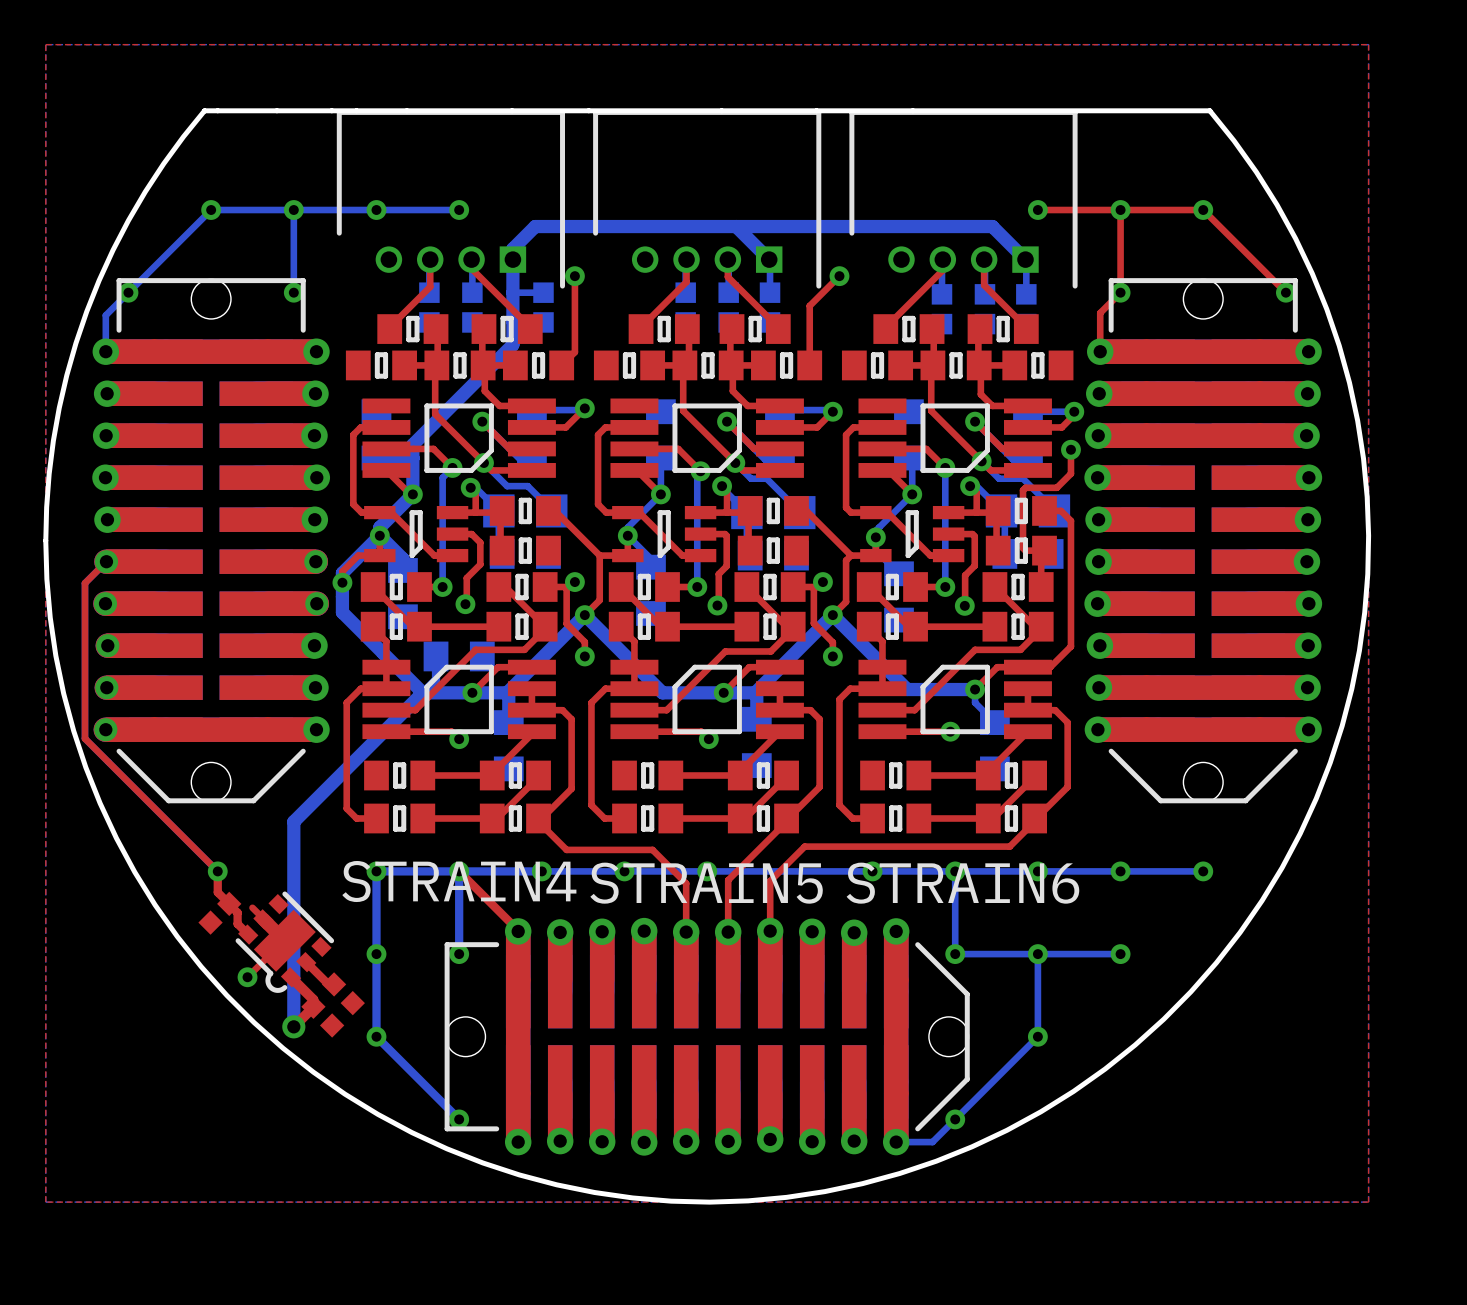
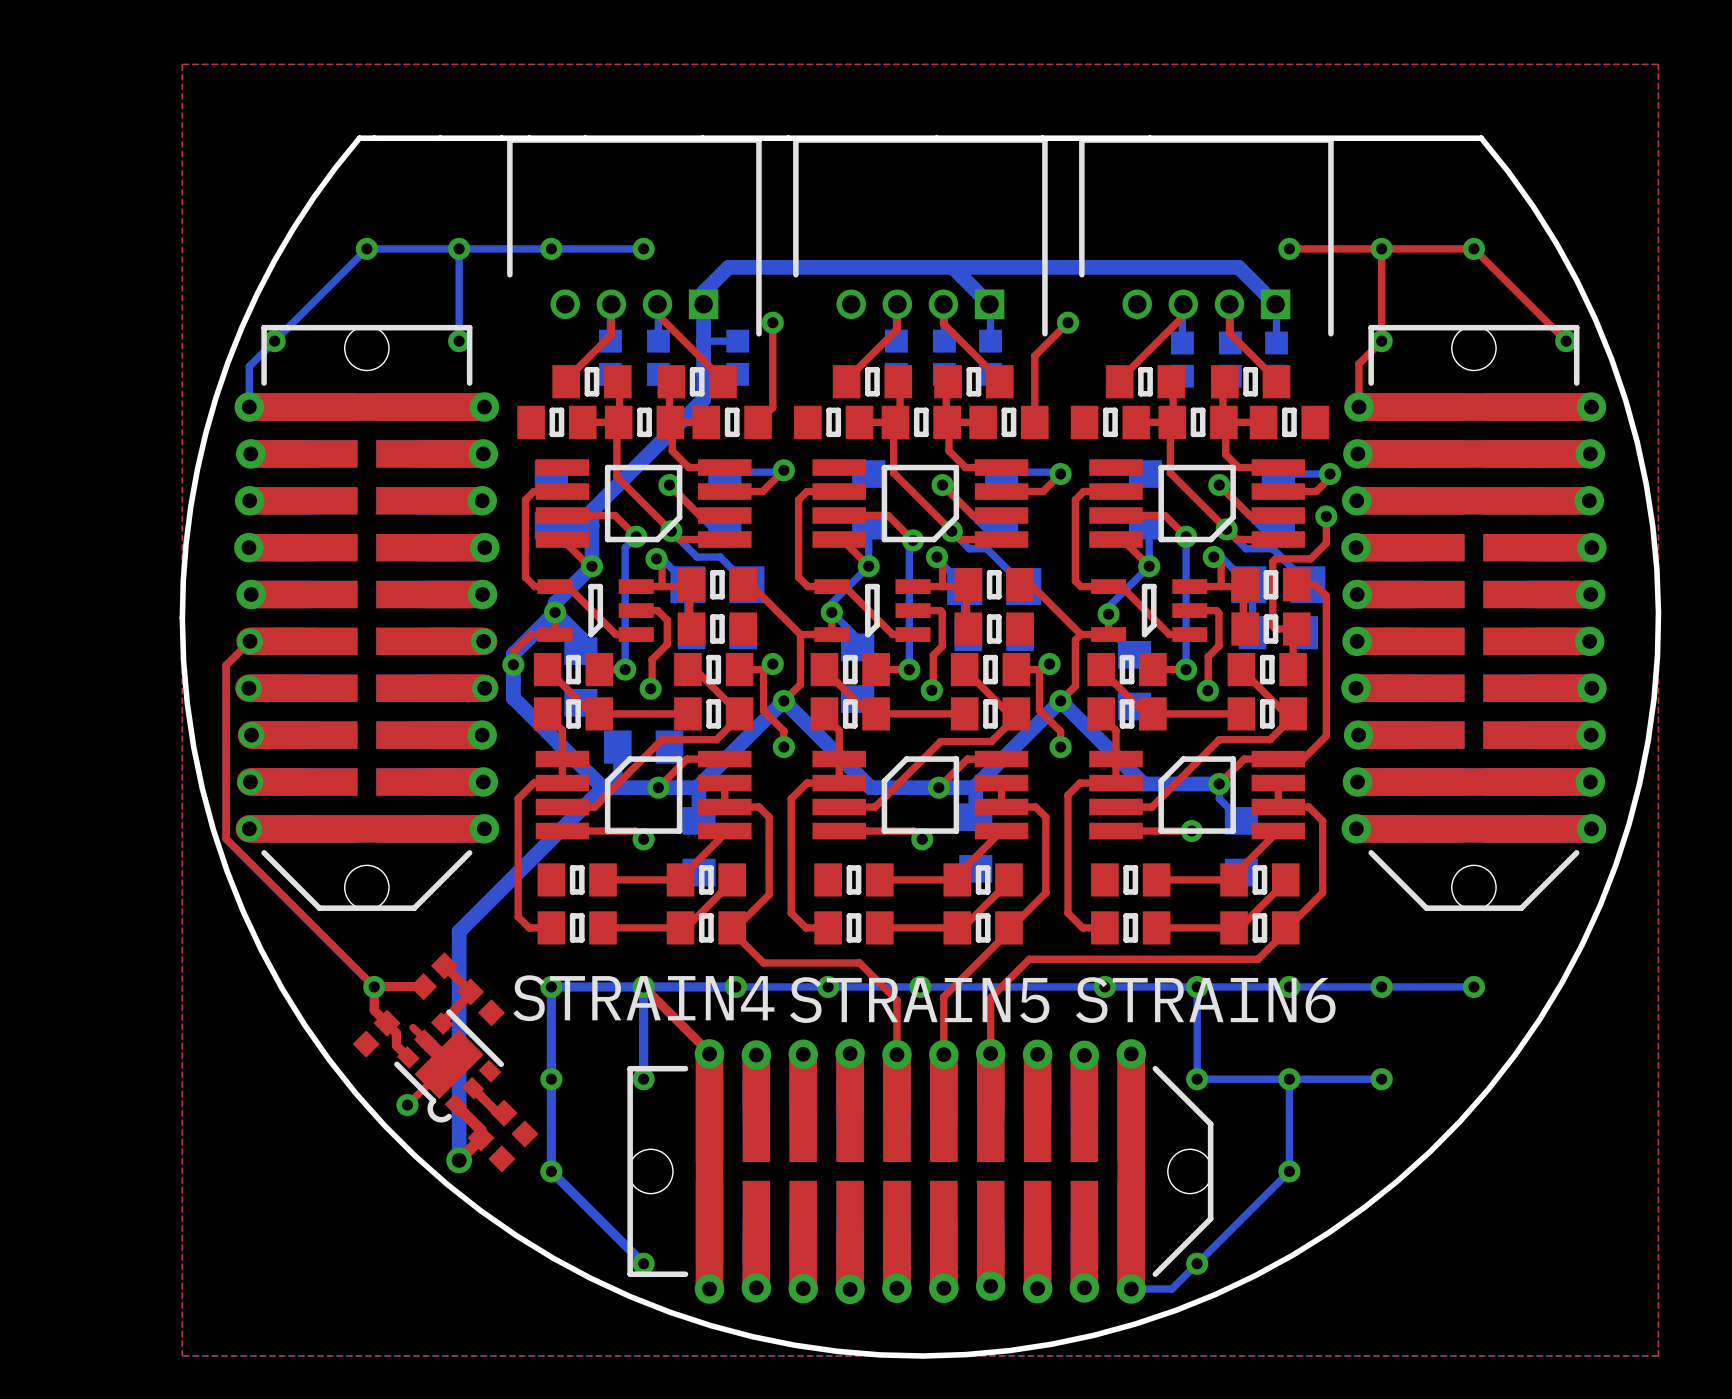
top track: none -> (444, 965) (470, 993) (442, 1022)
part: none -> (434, 976)
top track: none -> (374, 986) (423, 986)
part: none -> (481, 1002)

